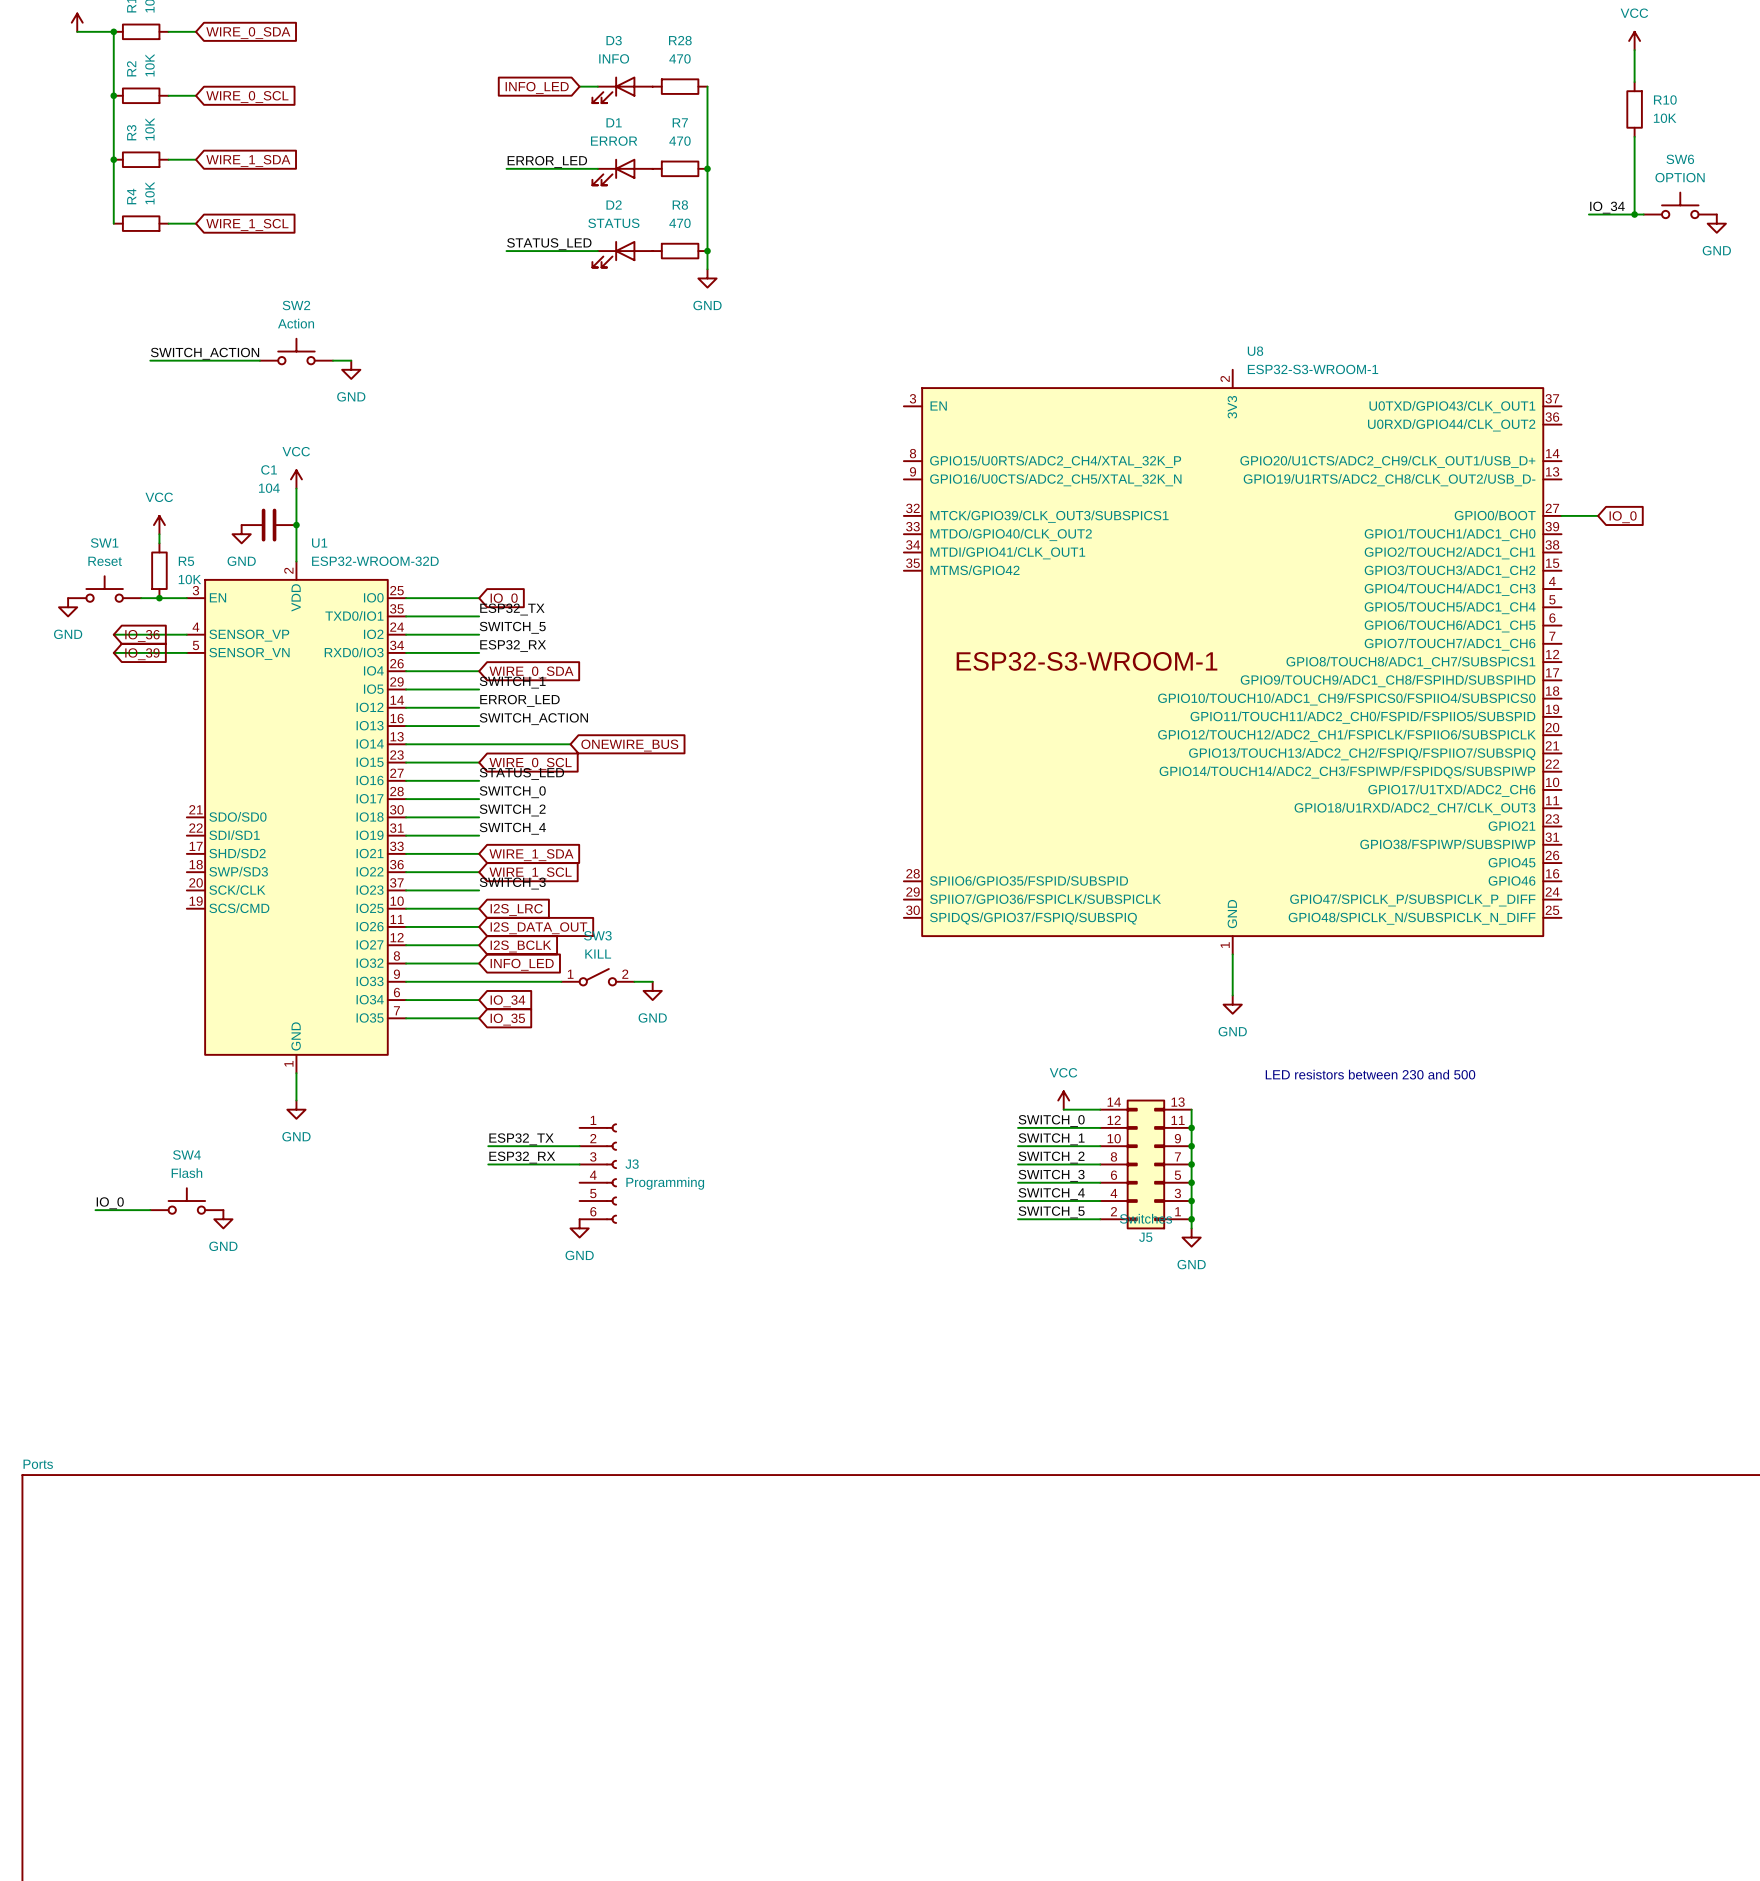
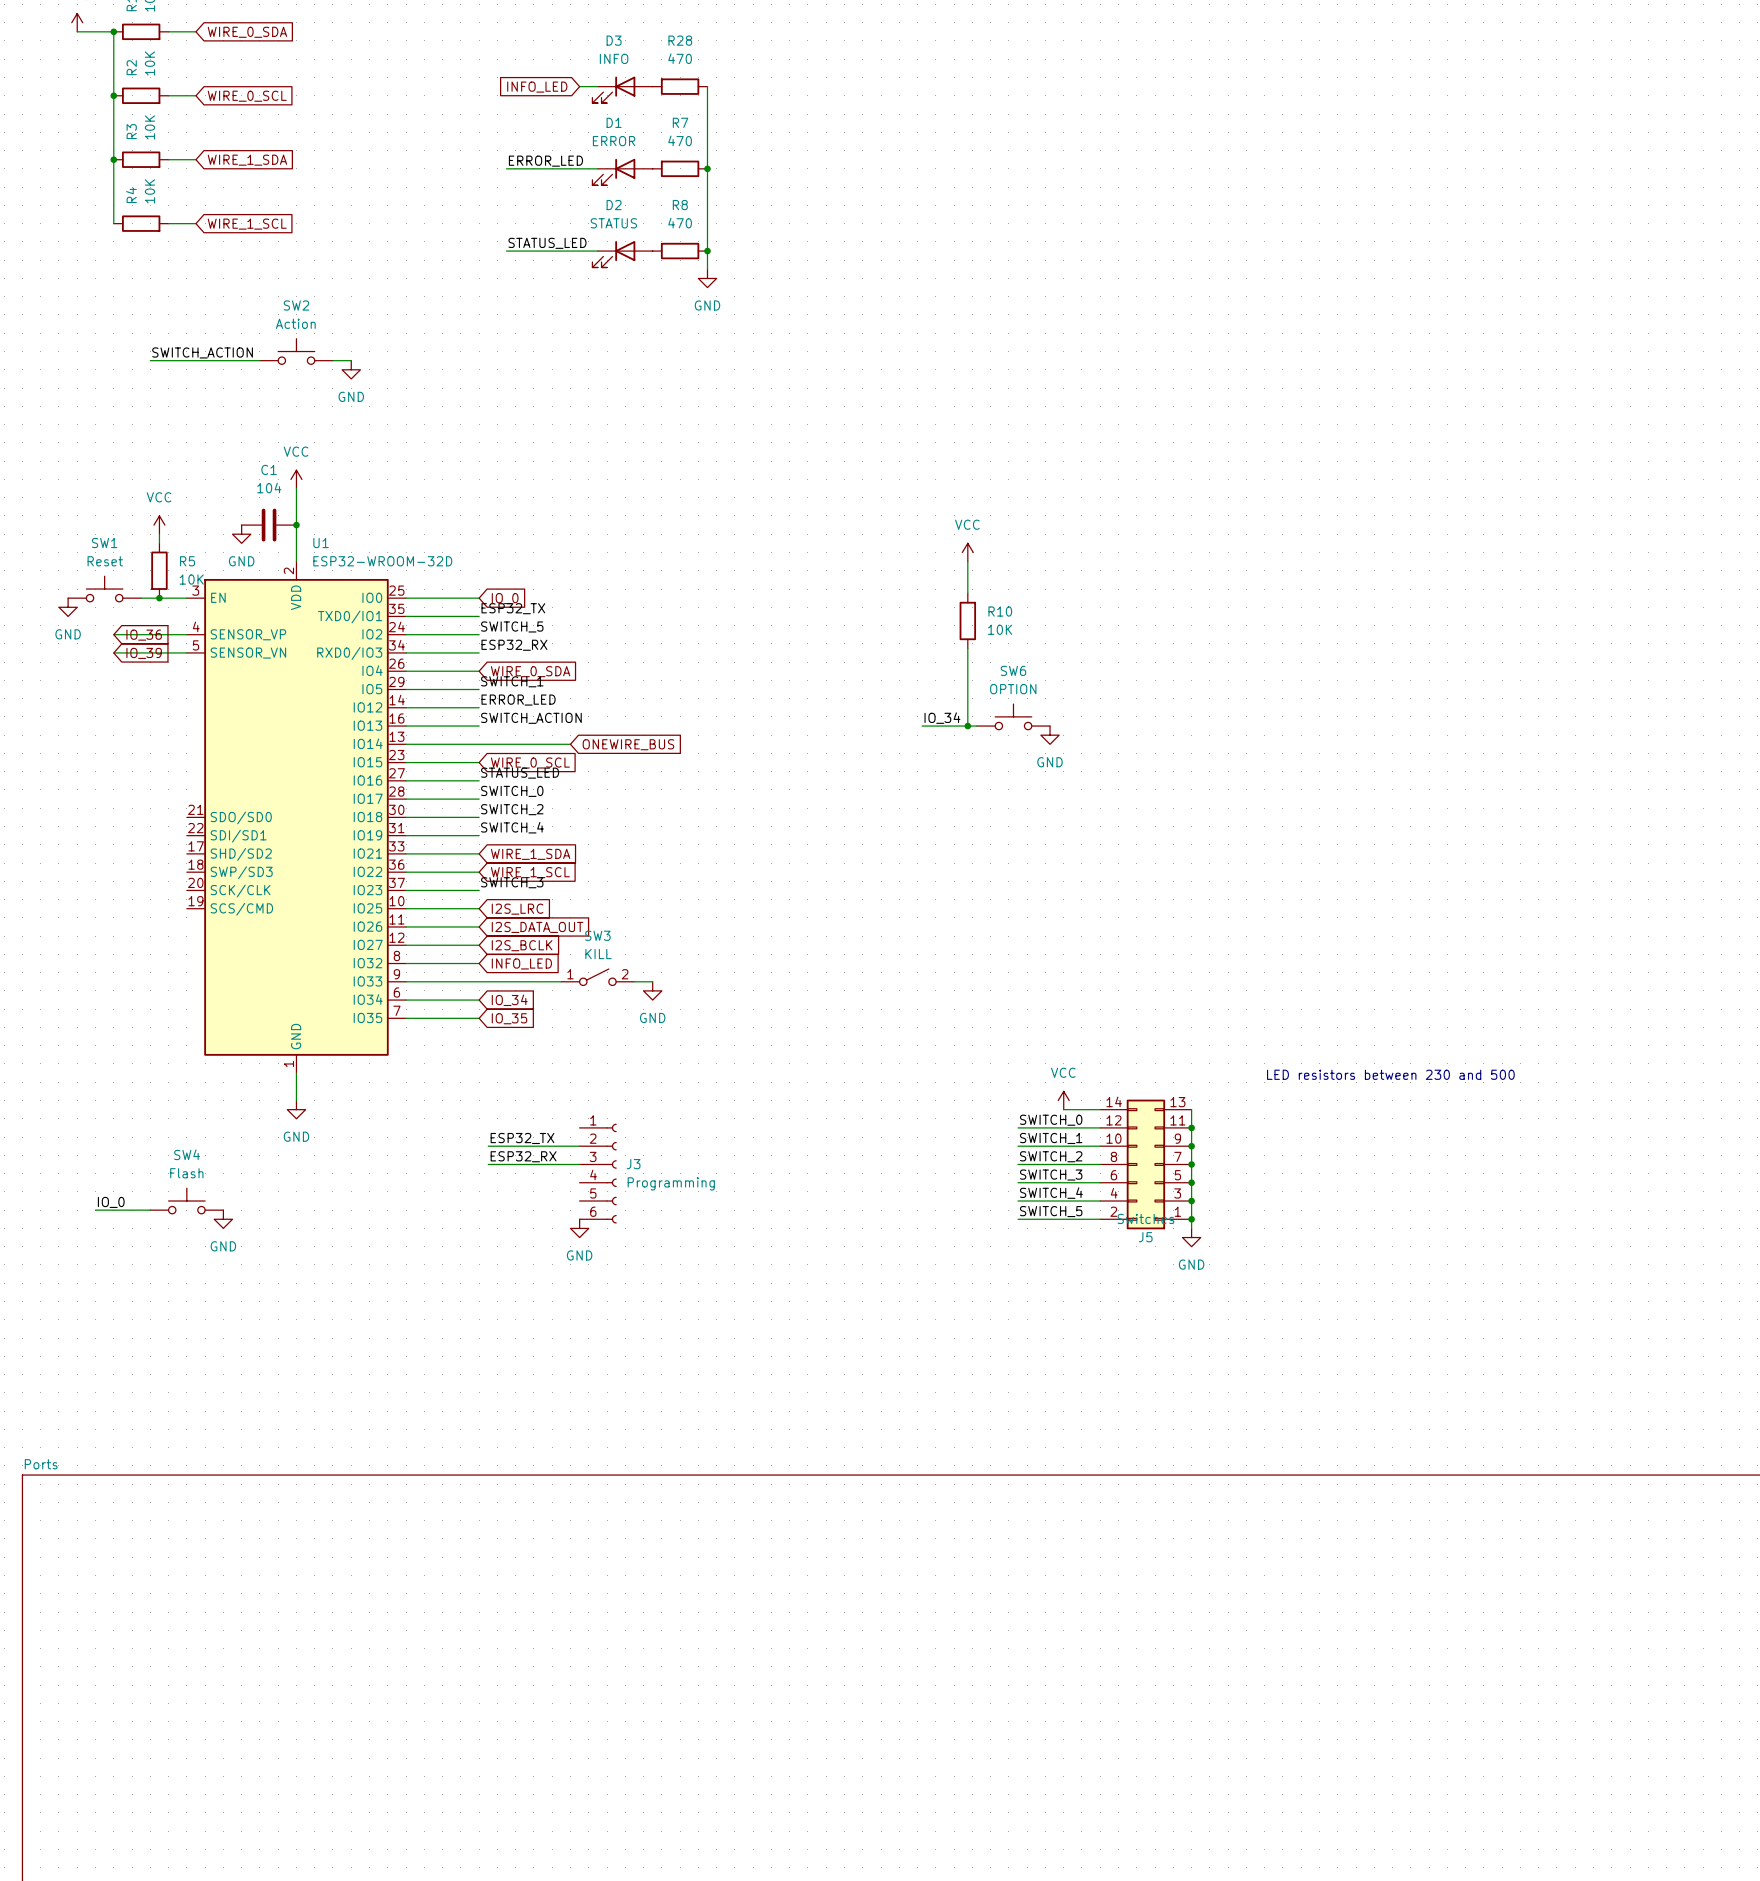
power symbol: VCC (1634, 40) -> none
wire: (1634, 50) (1634, 82) -> none
R10 position: (1634, 109) -> (967, 620)
wire: (1634, 136) (1634, 214) -> none
SW6 position: (1680, 205) -> (1013, 716)
label: IO_34 (1607, 207) -> none
wire: (1588, 214) (1643, 214) -> none
junction: (1634, 214) -> none
power symbol: GND (1716, 223) -> none
wire: (1561, 515) (1598, 515) -> none
global label: IO_0 (1623, 517) -> none
power symbol: none -> VCC (967, 552)
U8: ESP32-S3-WROOM-1 (1232, 662) -> none
label: none -> IO_34 (942, 718)
junction: none -> (967, 726)
power symbol: none -> GND (1050, 735)
wire: (1232, 954) (1232, 995) -> none
power symbol: GND (1232, 1004) -> none

